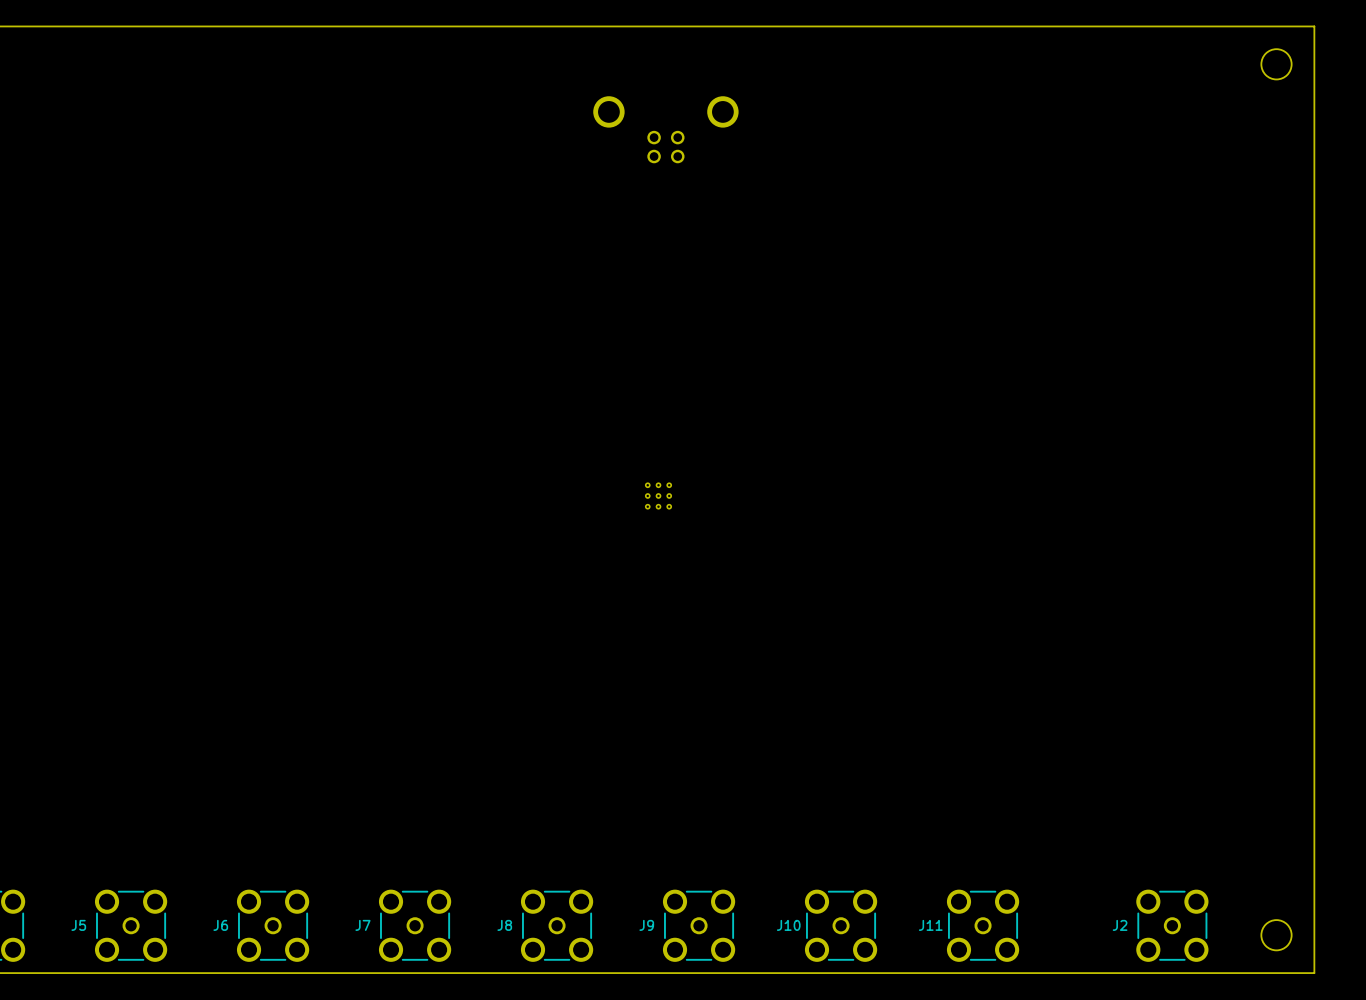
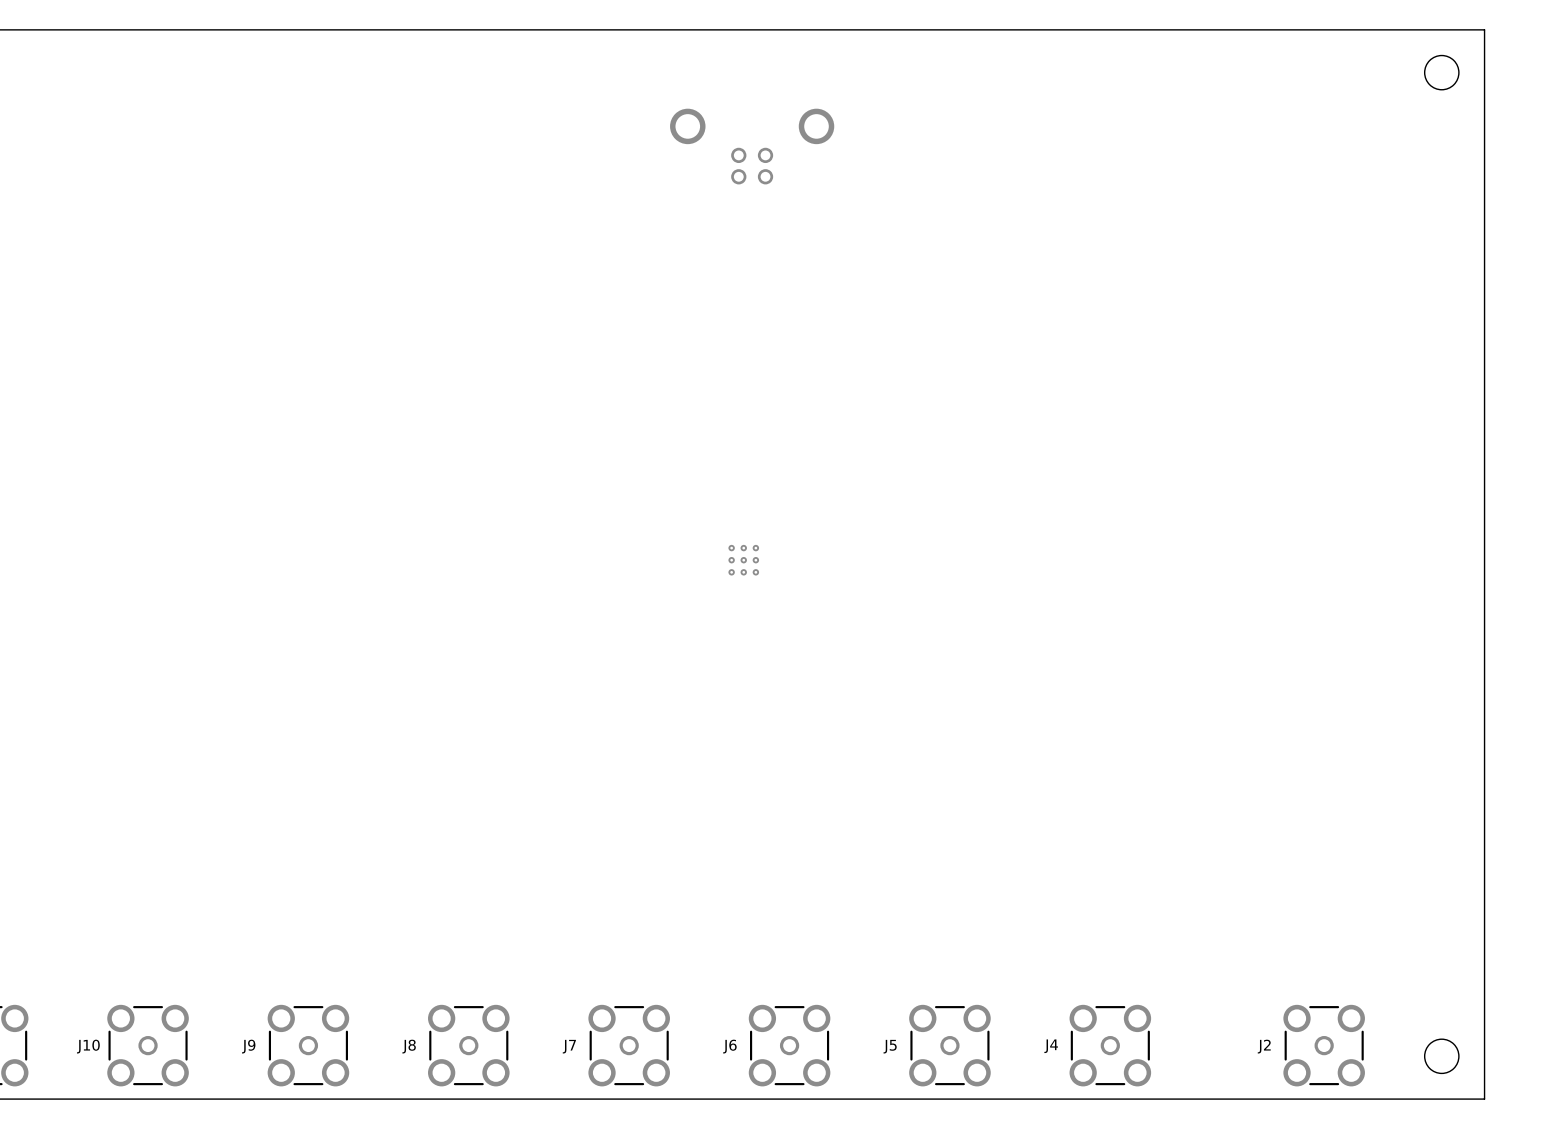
J5 name: J5 (78, 925) -> J10 (88, 1046)
J6 name: J6 (220, 925) -> J9 (248, 1046)
J7 name: J7 (363, 925) -> J8 (409, 1046)
J8 name: J8 (504, 925) -> J7 (569, 1046)
J9 name: J9 (646, 925) -> J6 (729, 1046)
J10 name: J10 (788, 925) -> J5 (890, 1046)
J11 name: J11 (930, 925) -> J4 (1051, 1046)

